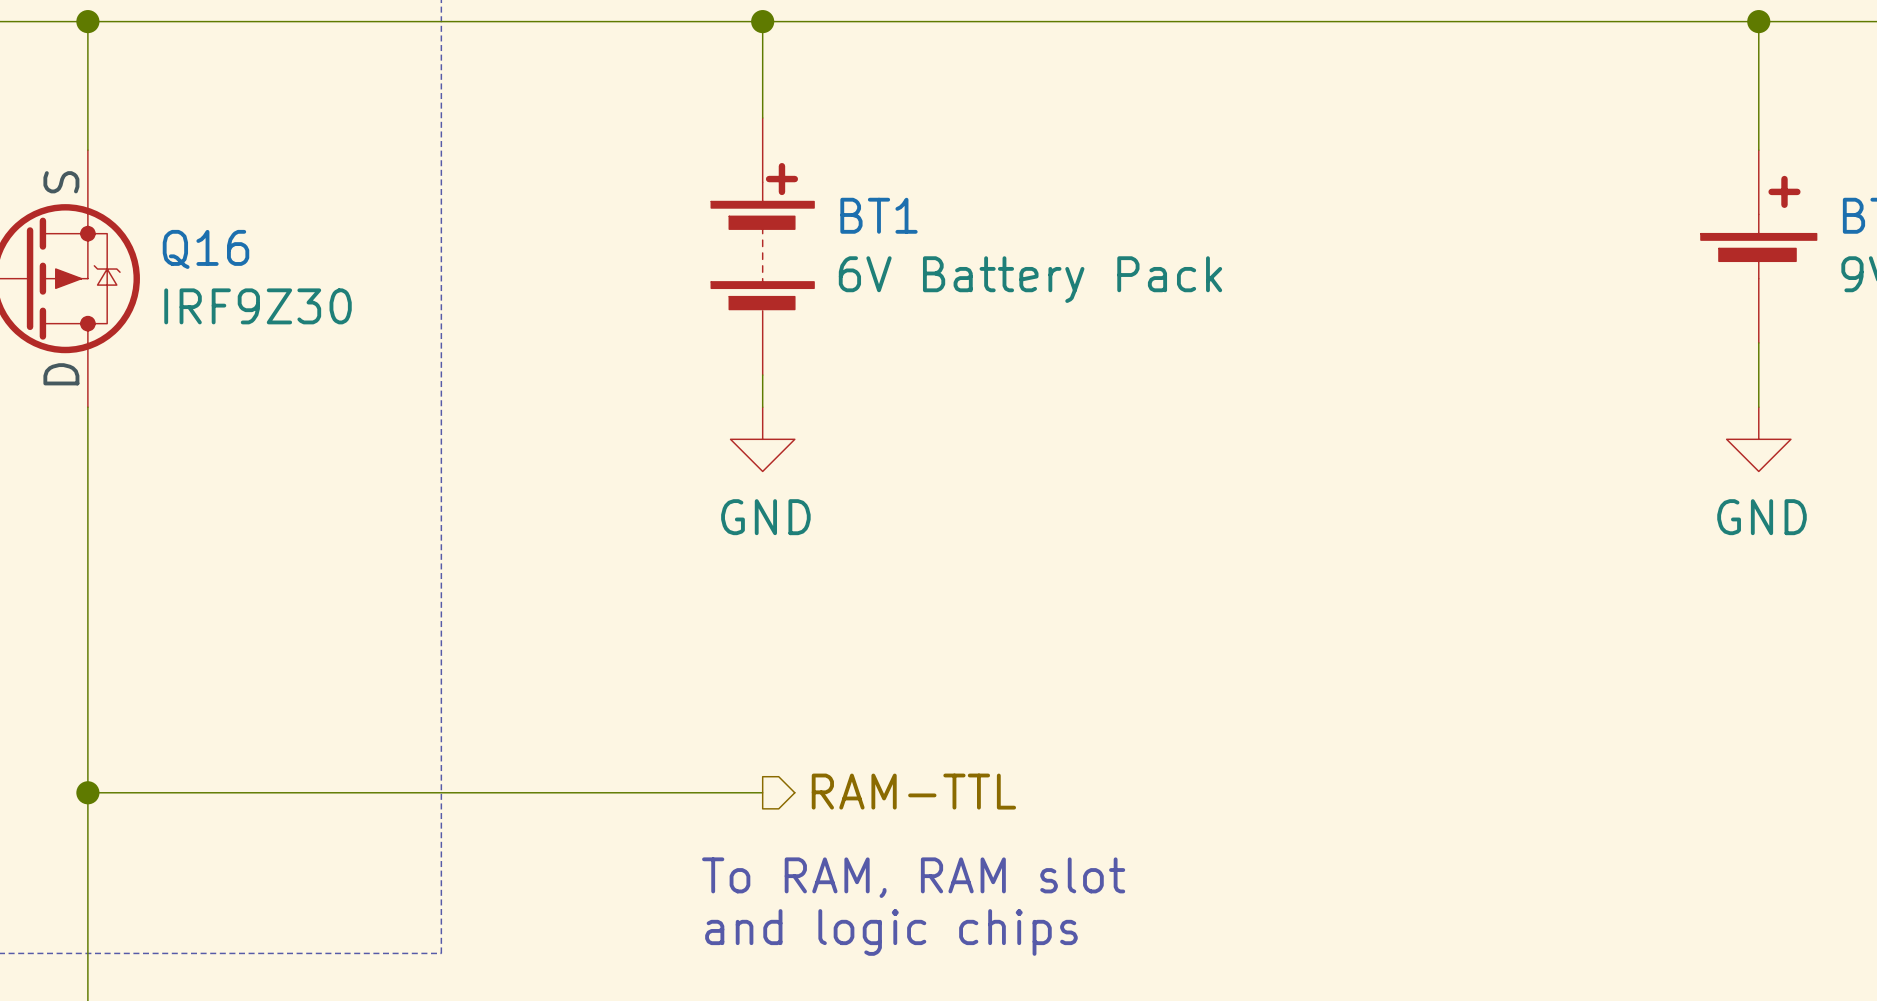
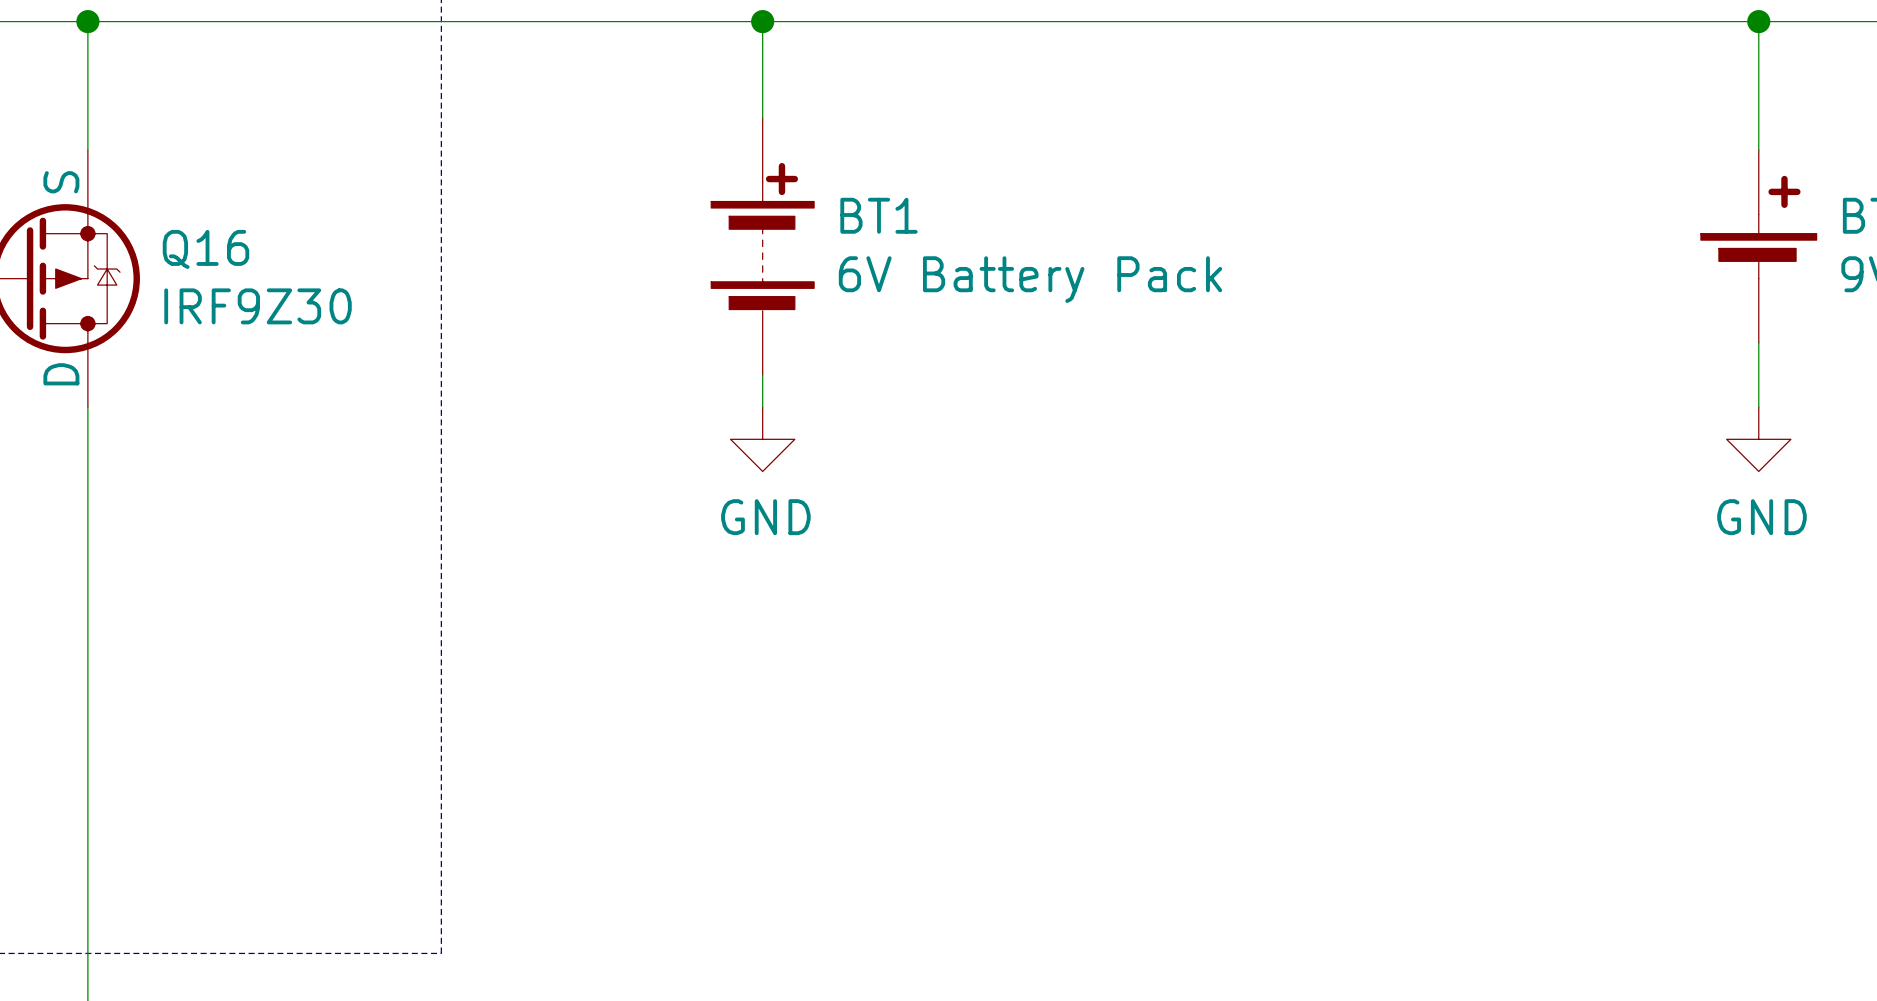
hierarchical label: RAM-TTL (913, 791) -> none
wire: (87, 792) (762, 792) -> none
junction: (87, 792) -> none
text: To RAM, RAM slot (913, 877) -> none
text: and logic chips (891, 932) -> none

